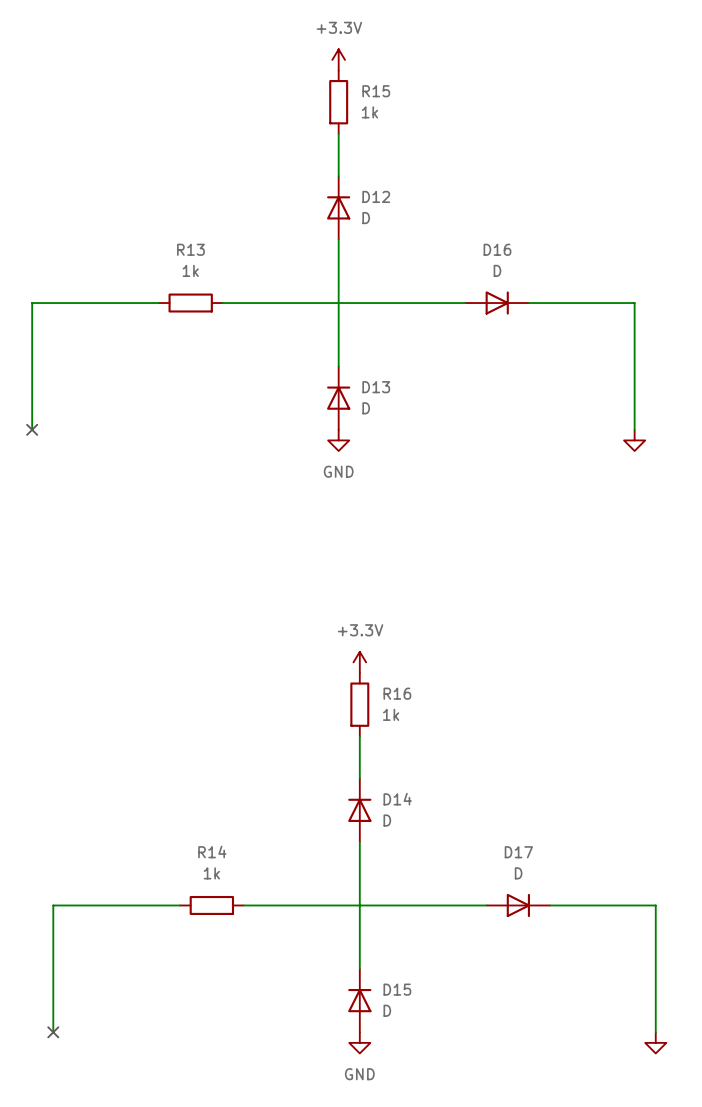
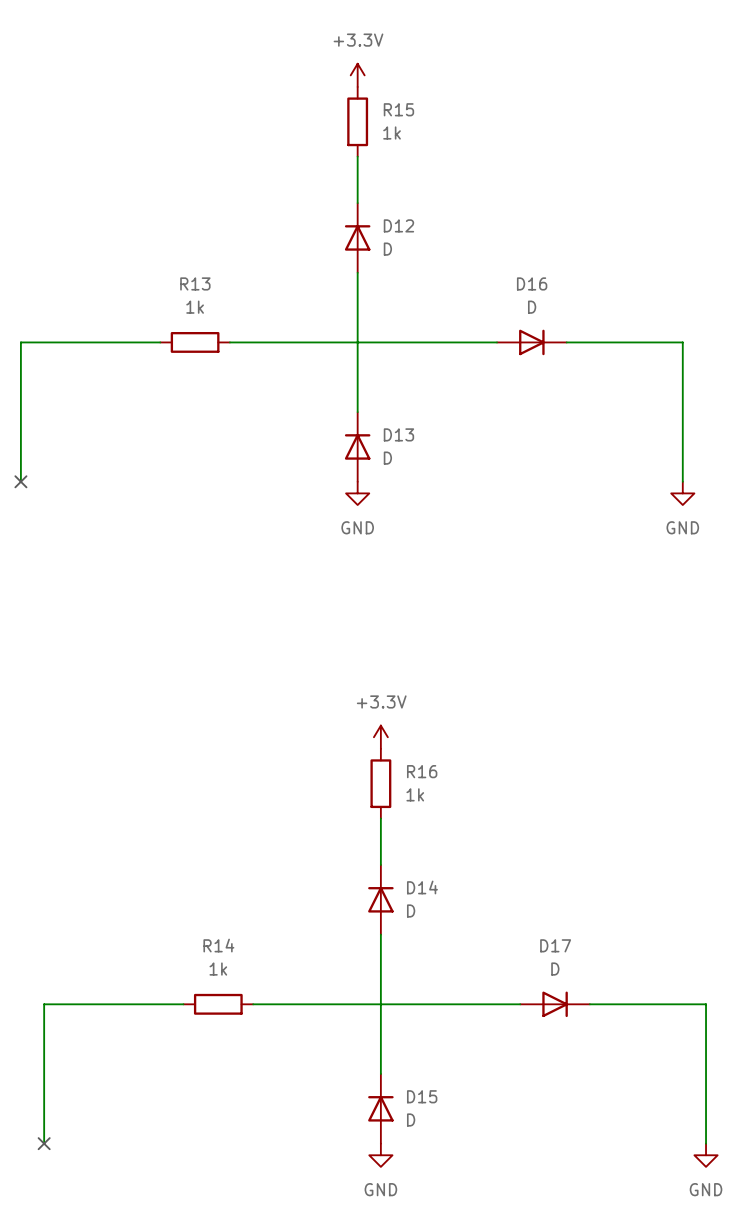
power symbol text: none -> GND (682, 527)
power symbol text: none -> GND (706, 1189)

